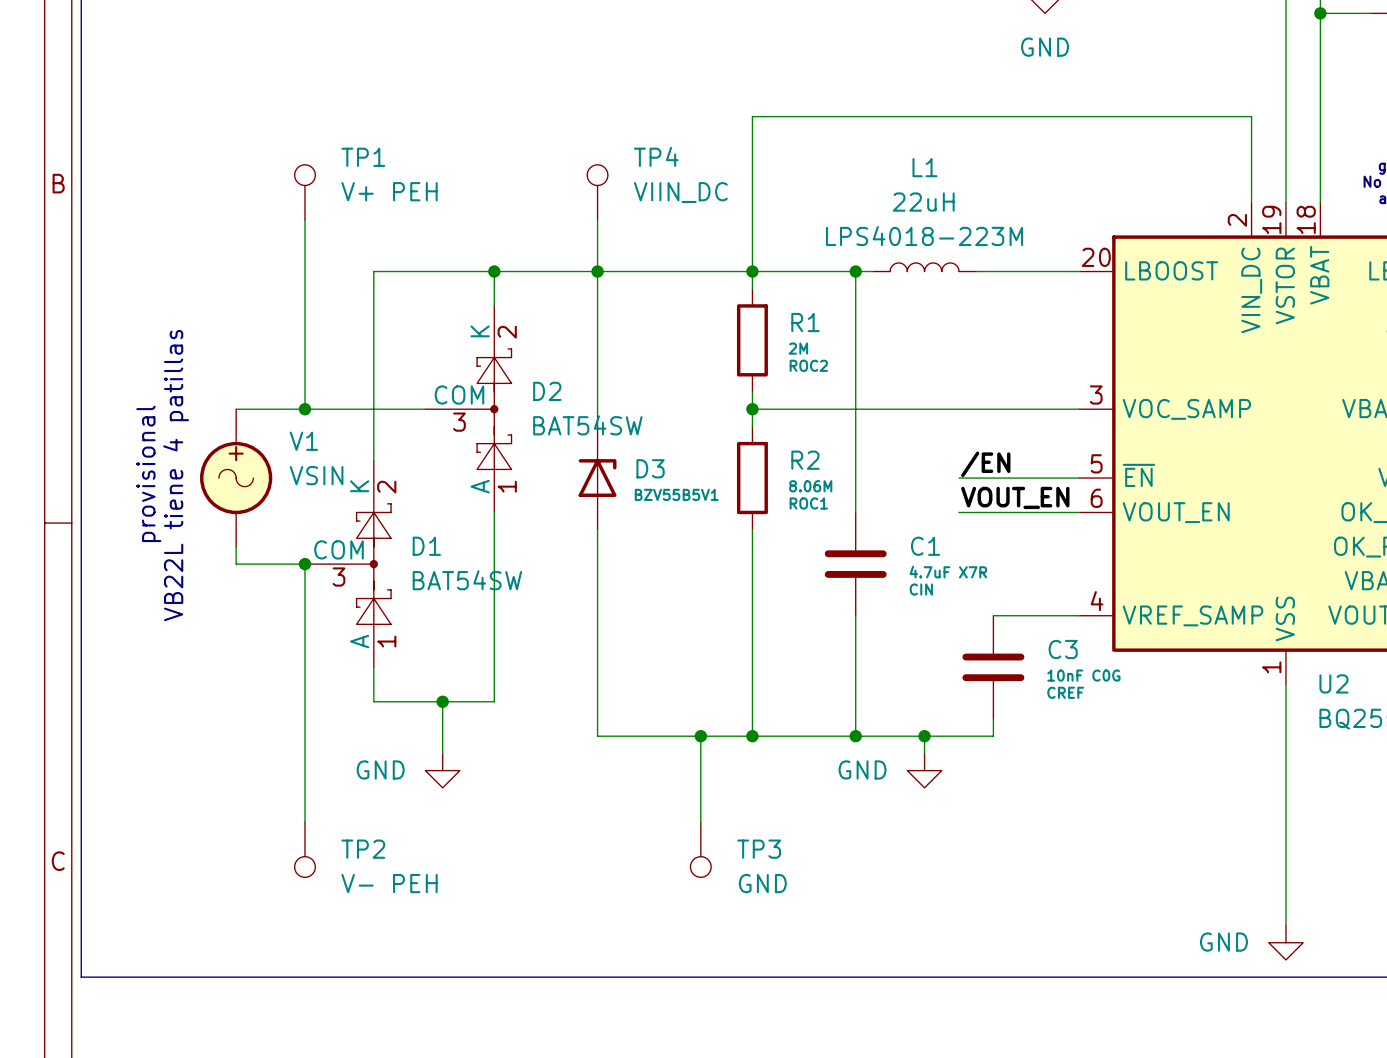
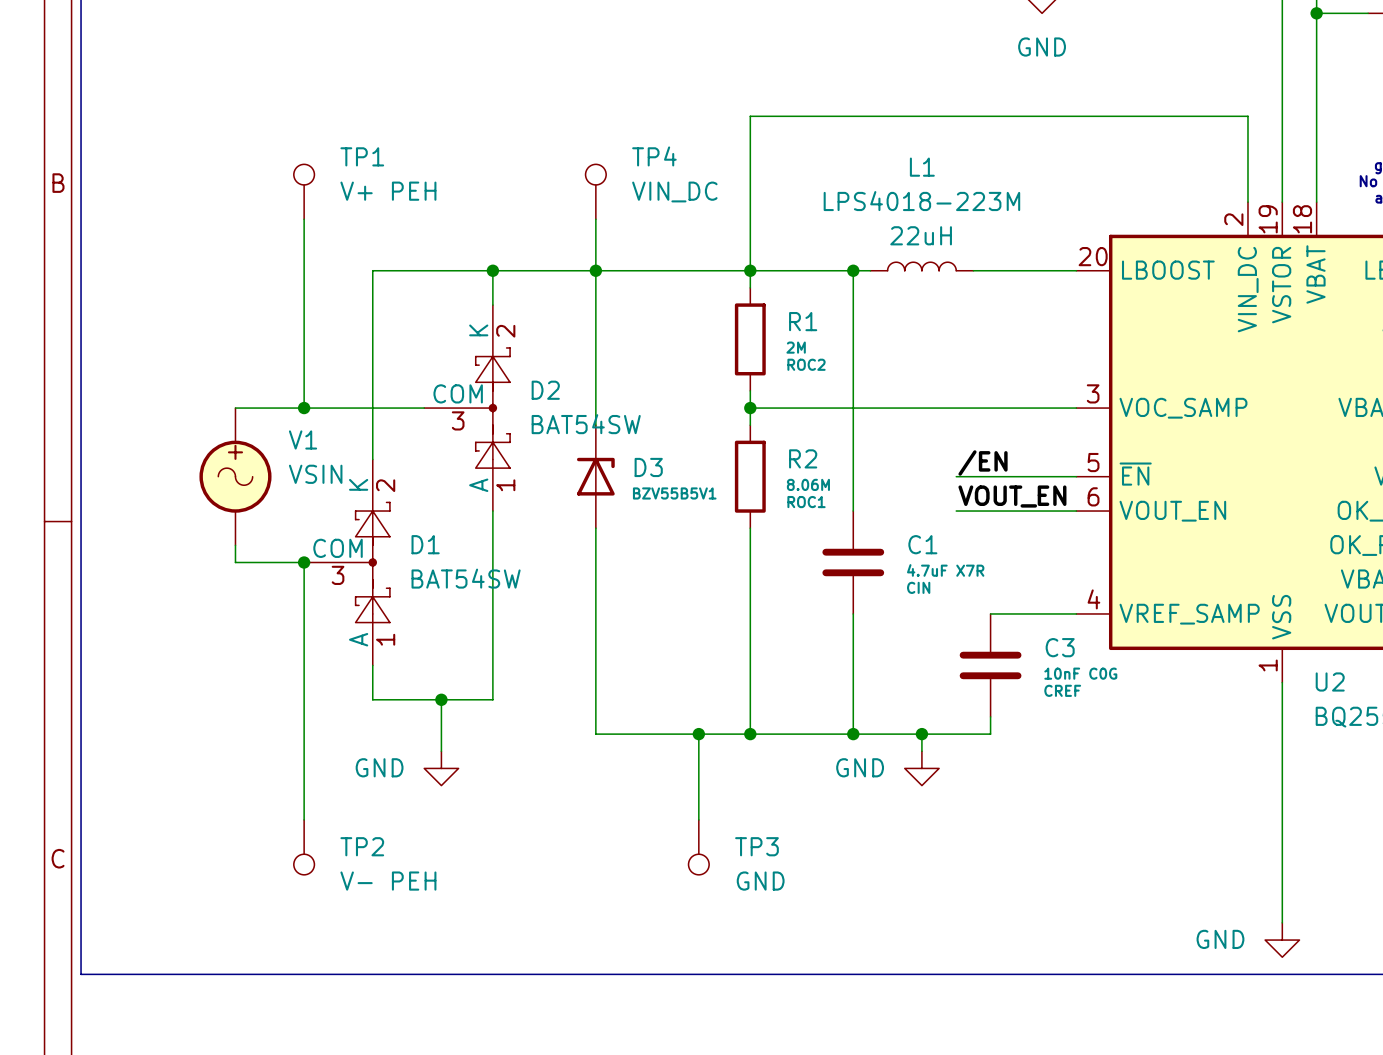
TP4 text: VIIN_DC (680, 192) -> VIN_DC (674, 191)
L1 value: 22uH (923, 202) -> LPS4018-223M (921, 201)
L1 text: LPS4018-223M (924, 236) -> 22uH (921, 235)
text: provisional (148, 473) -> none
text: VB22L tiene 4 patillas (176, 475) -> none

